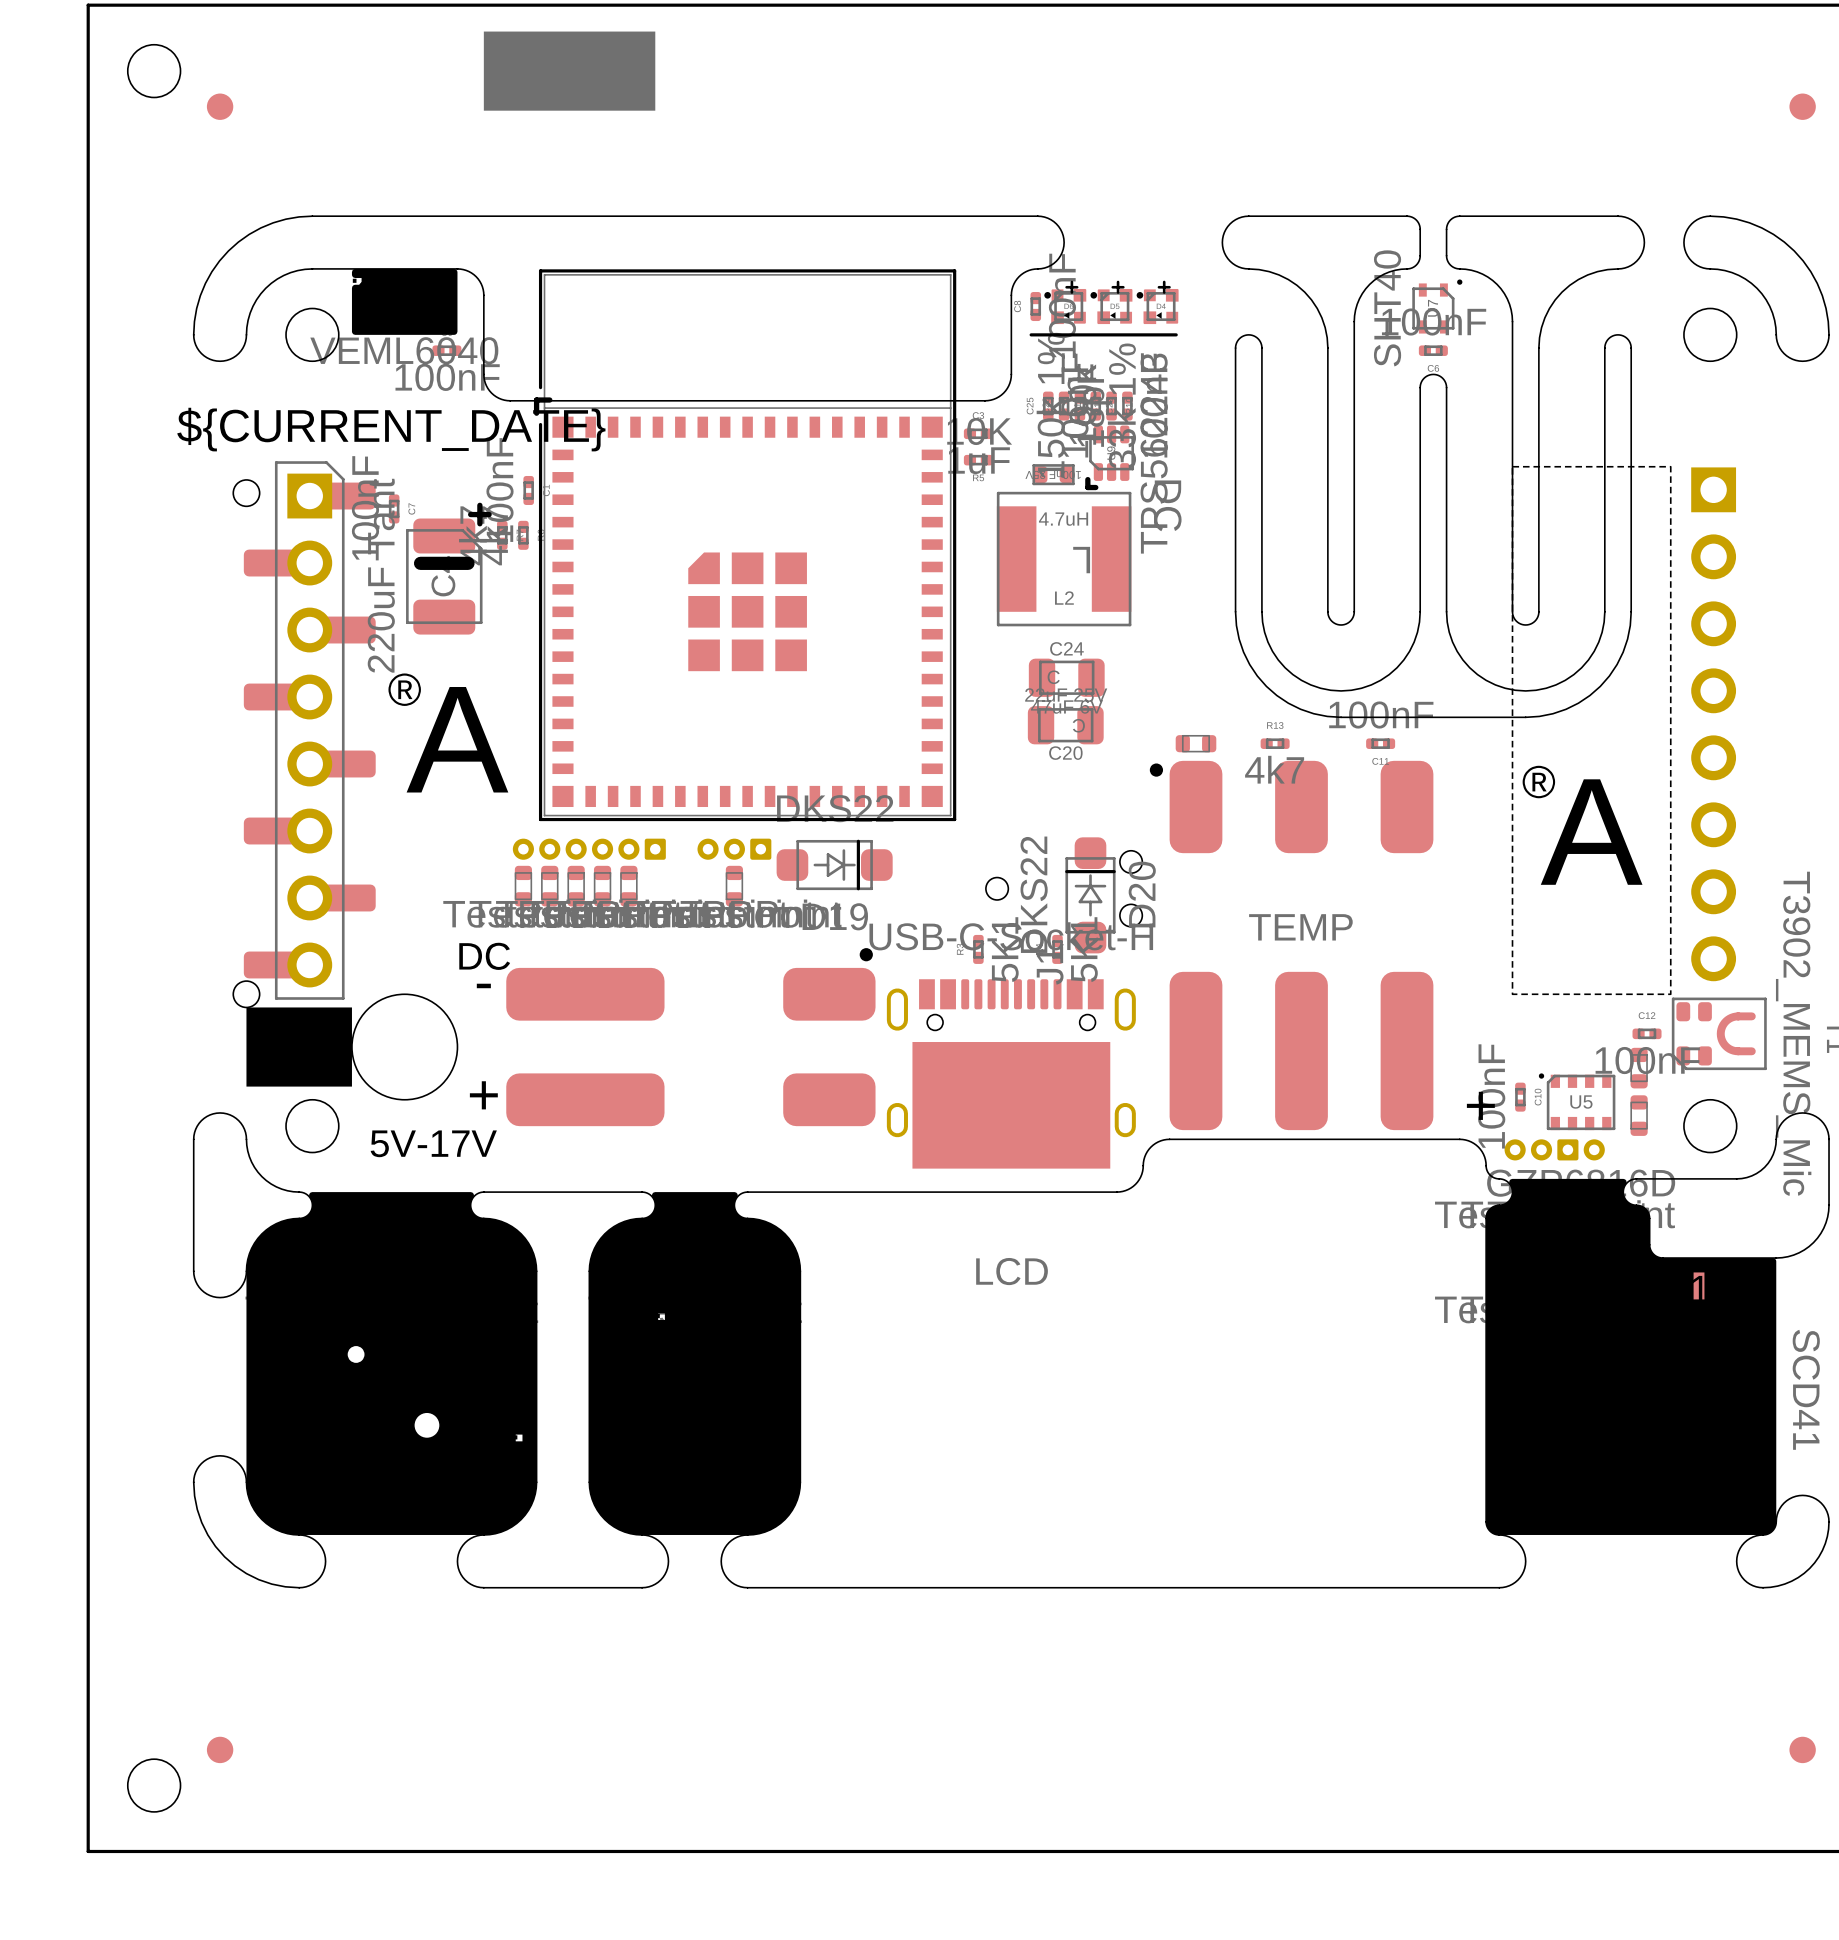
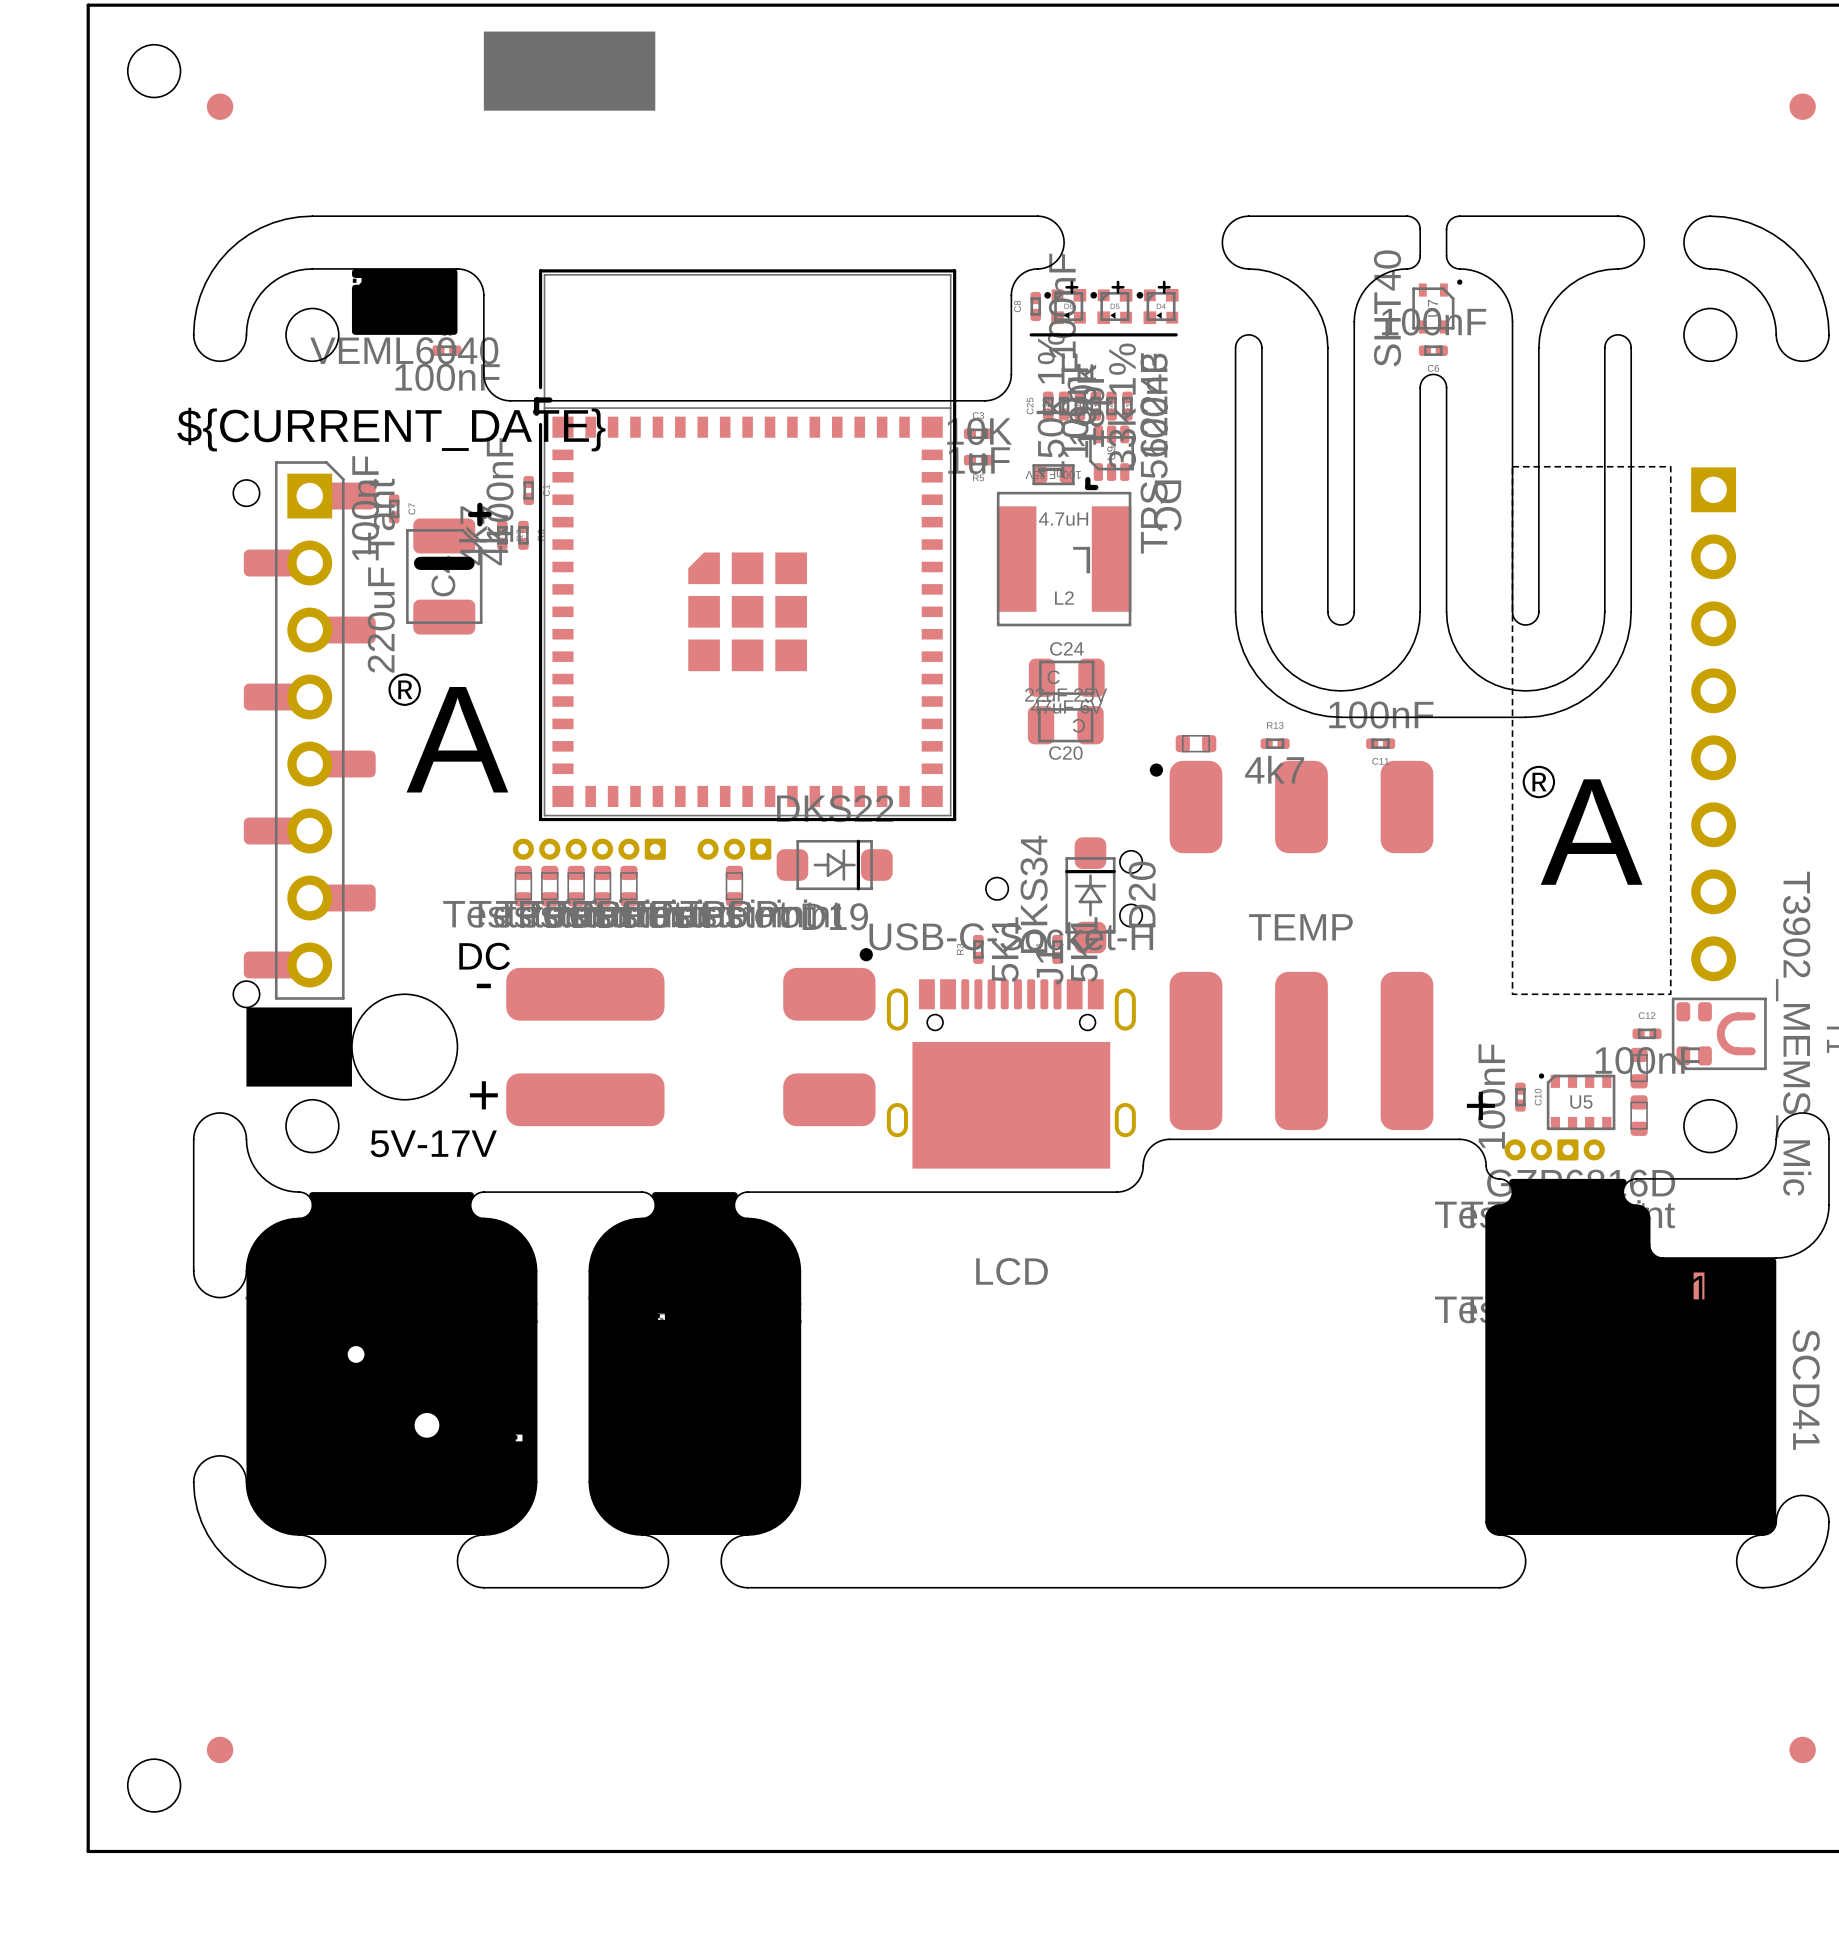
D20 value: DKS22 (1034, 894) -> DKS34 (1034, 894)

